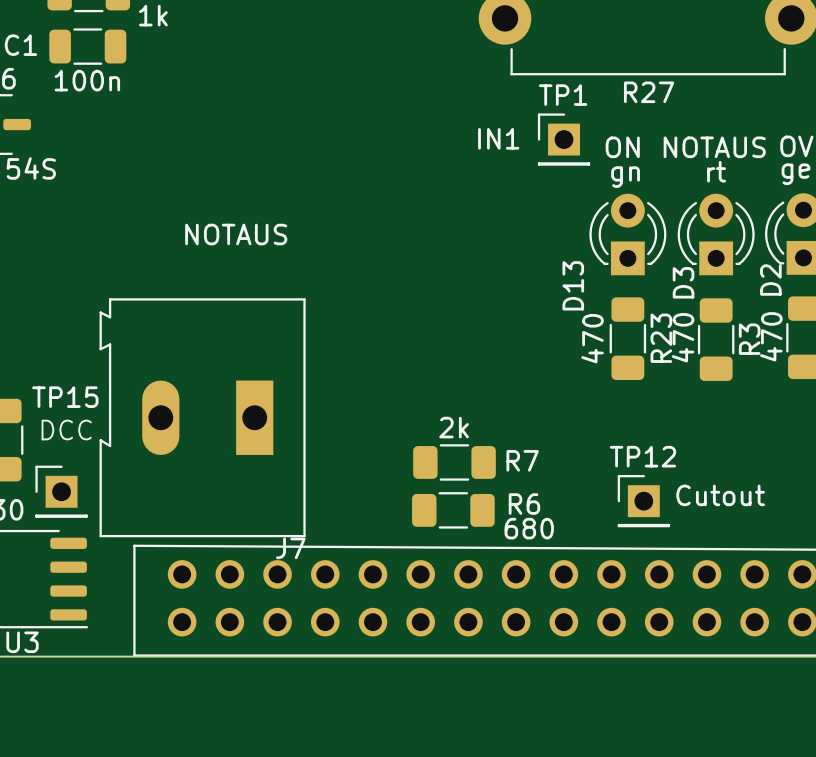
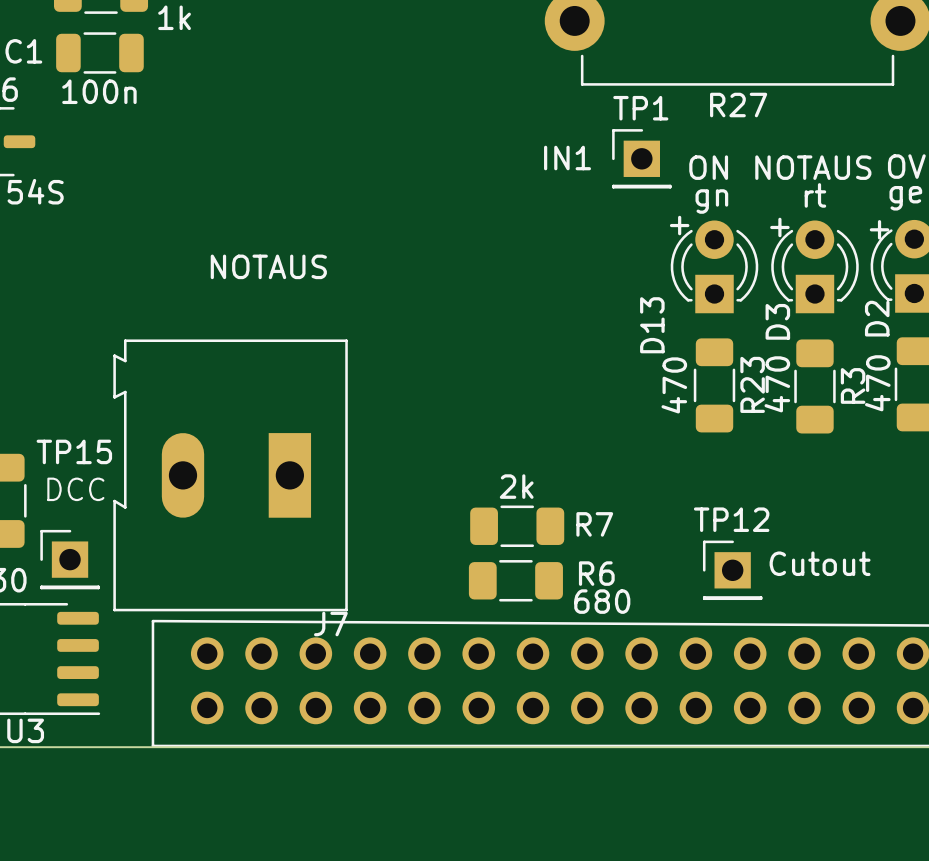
text: none -> + (679, 225)
text: none -> + (779, 227)
text: none -> + (879, 229)

